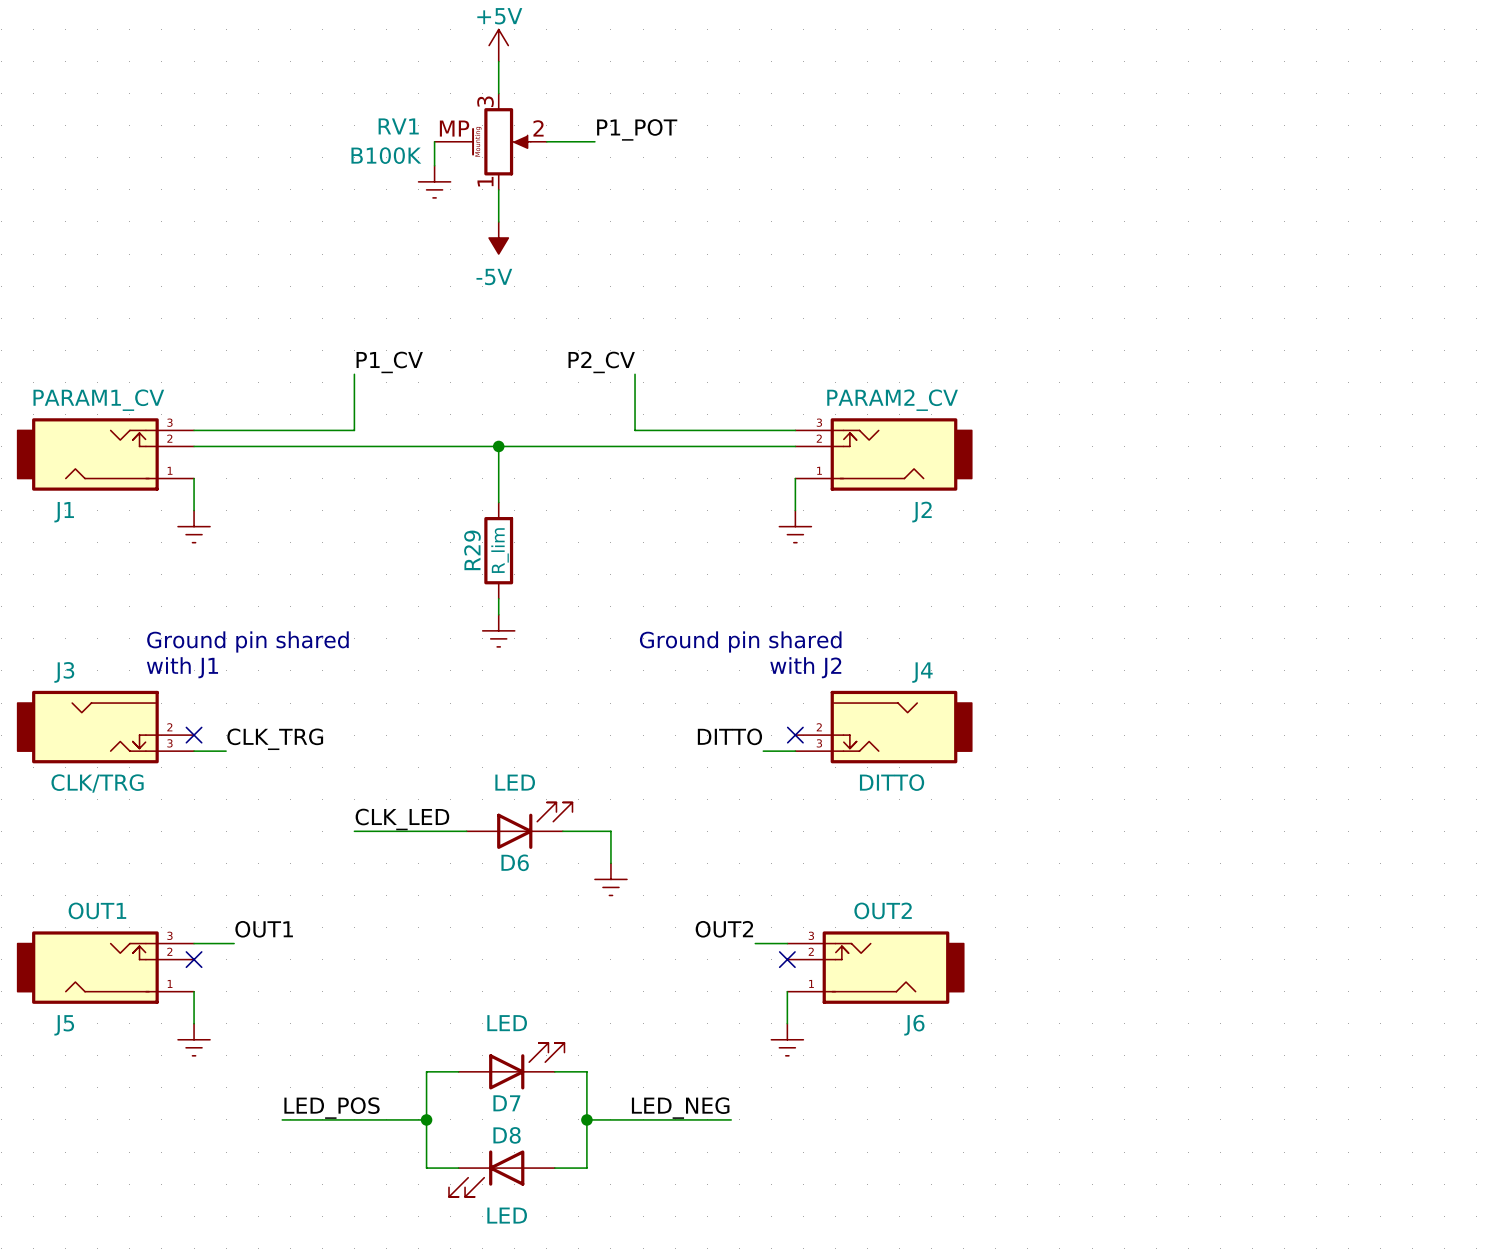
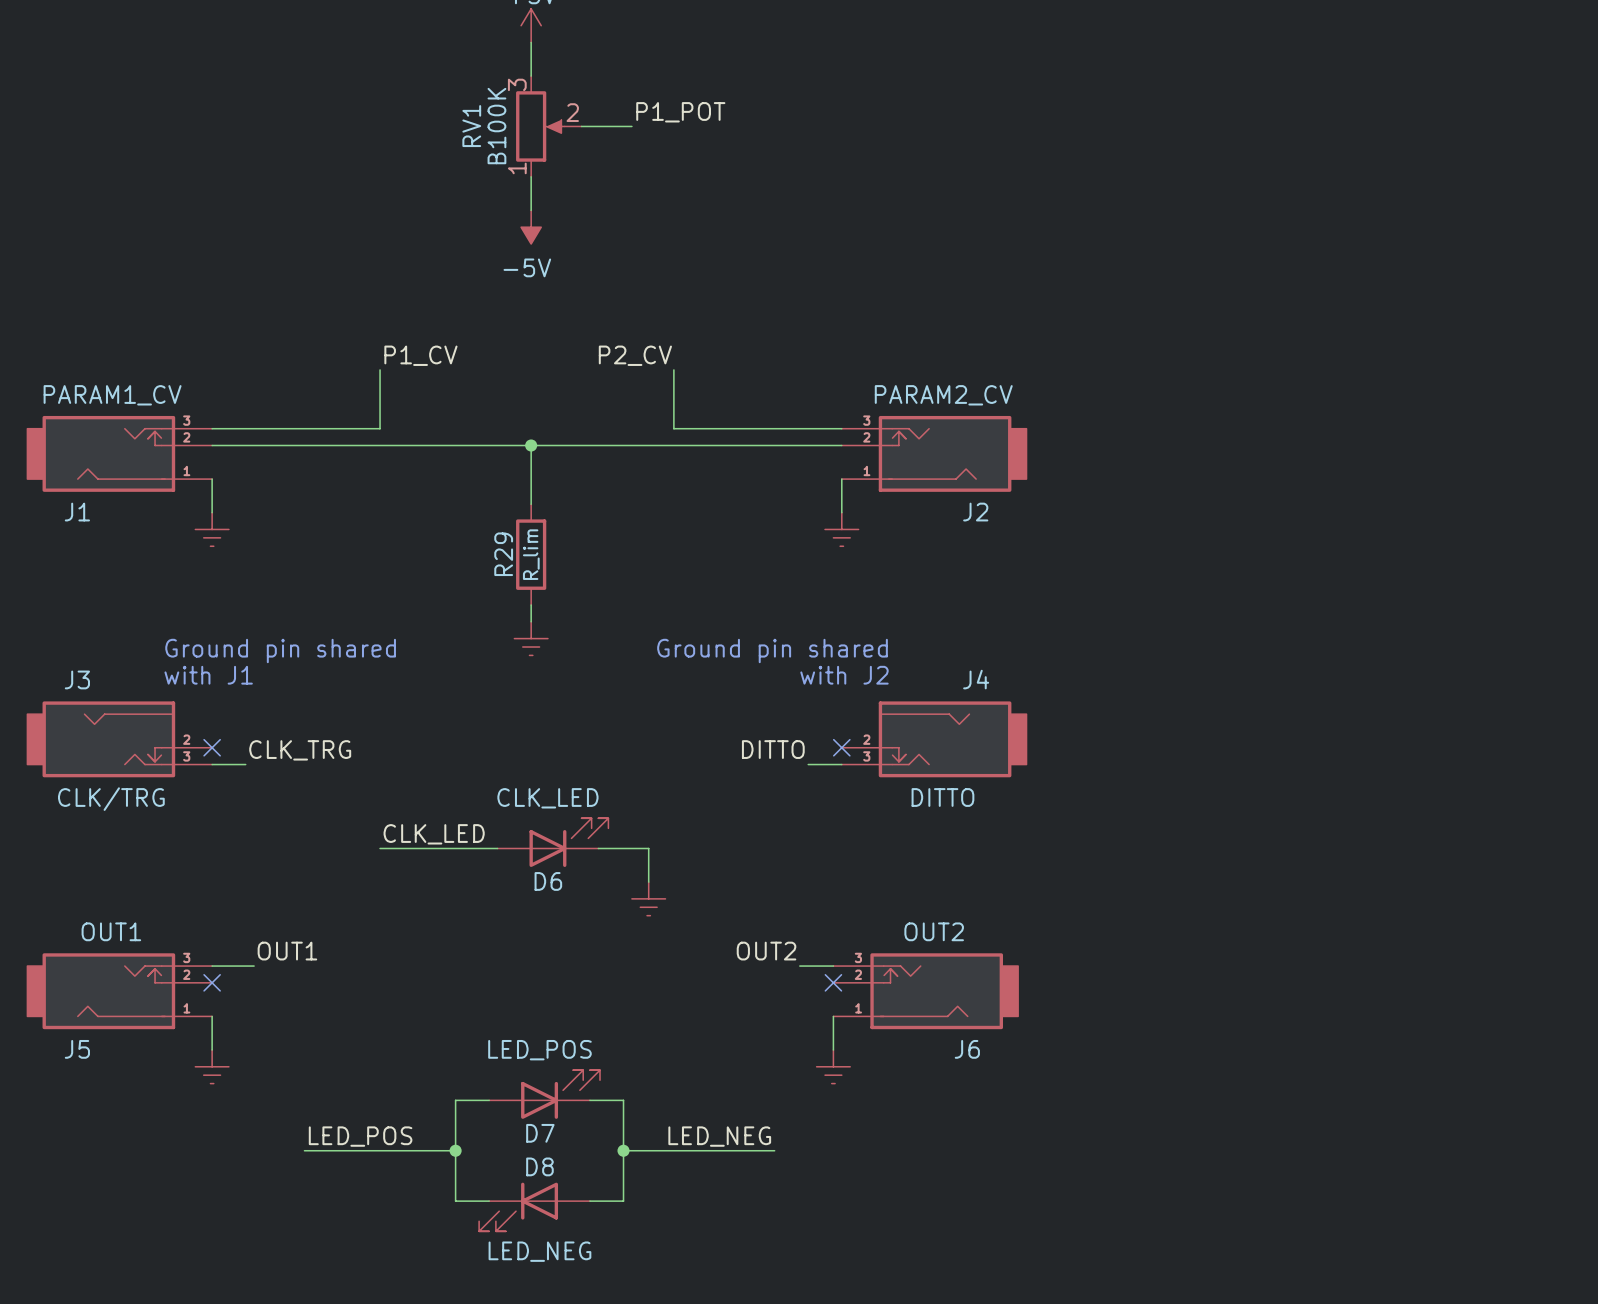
RV1 symbol: [434, 93, 547, 190] -> [516, 76, 582, 177]
RV1 name position: RV1 (398, 126) -> RV1 (471, 126)
wire: (434, 141) (434, 165) -> none
RV1 value position: B100K (386, 155) -> B100K (496, 126)
power symbol: (434, 181) -> none
D6 value: LED (515, 782) -> CLK_LED (547, 798)
D7 value: LED (507, 1023) -> LED_POS (539, 1050)
D8 value: LED (507, 1215) -> LED_NEG (539, 1251)

